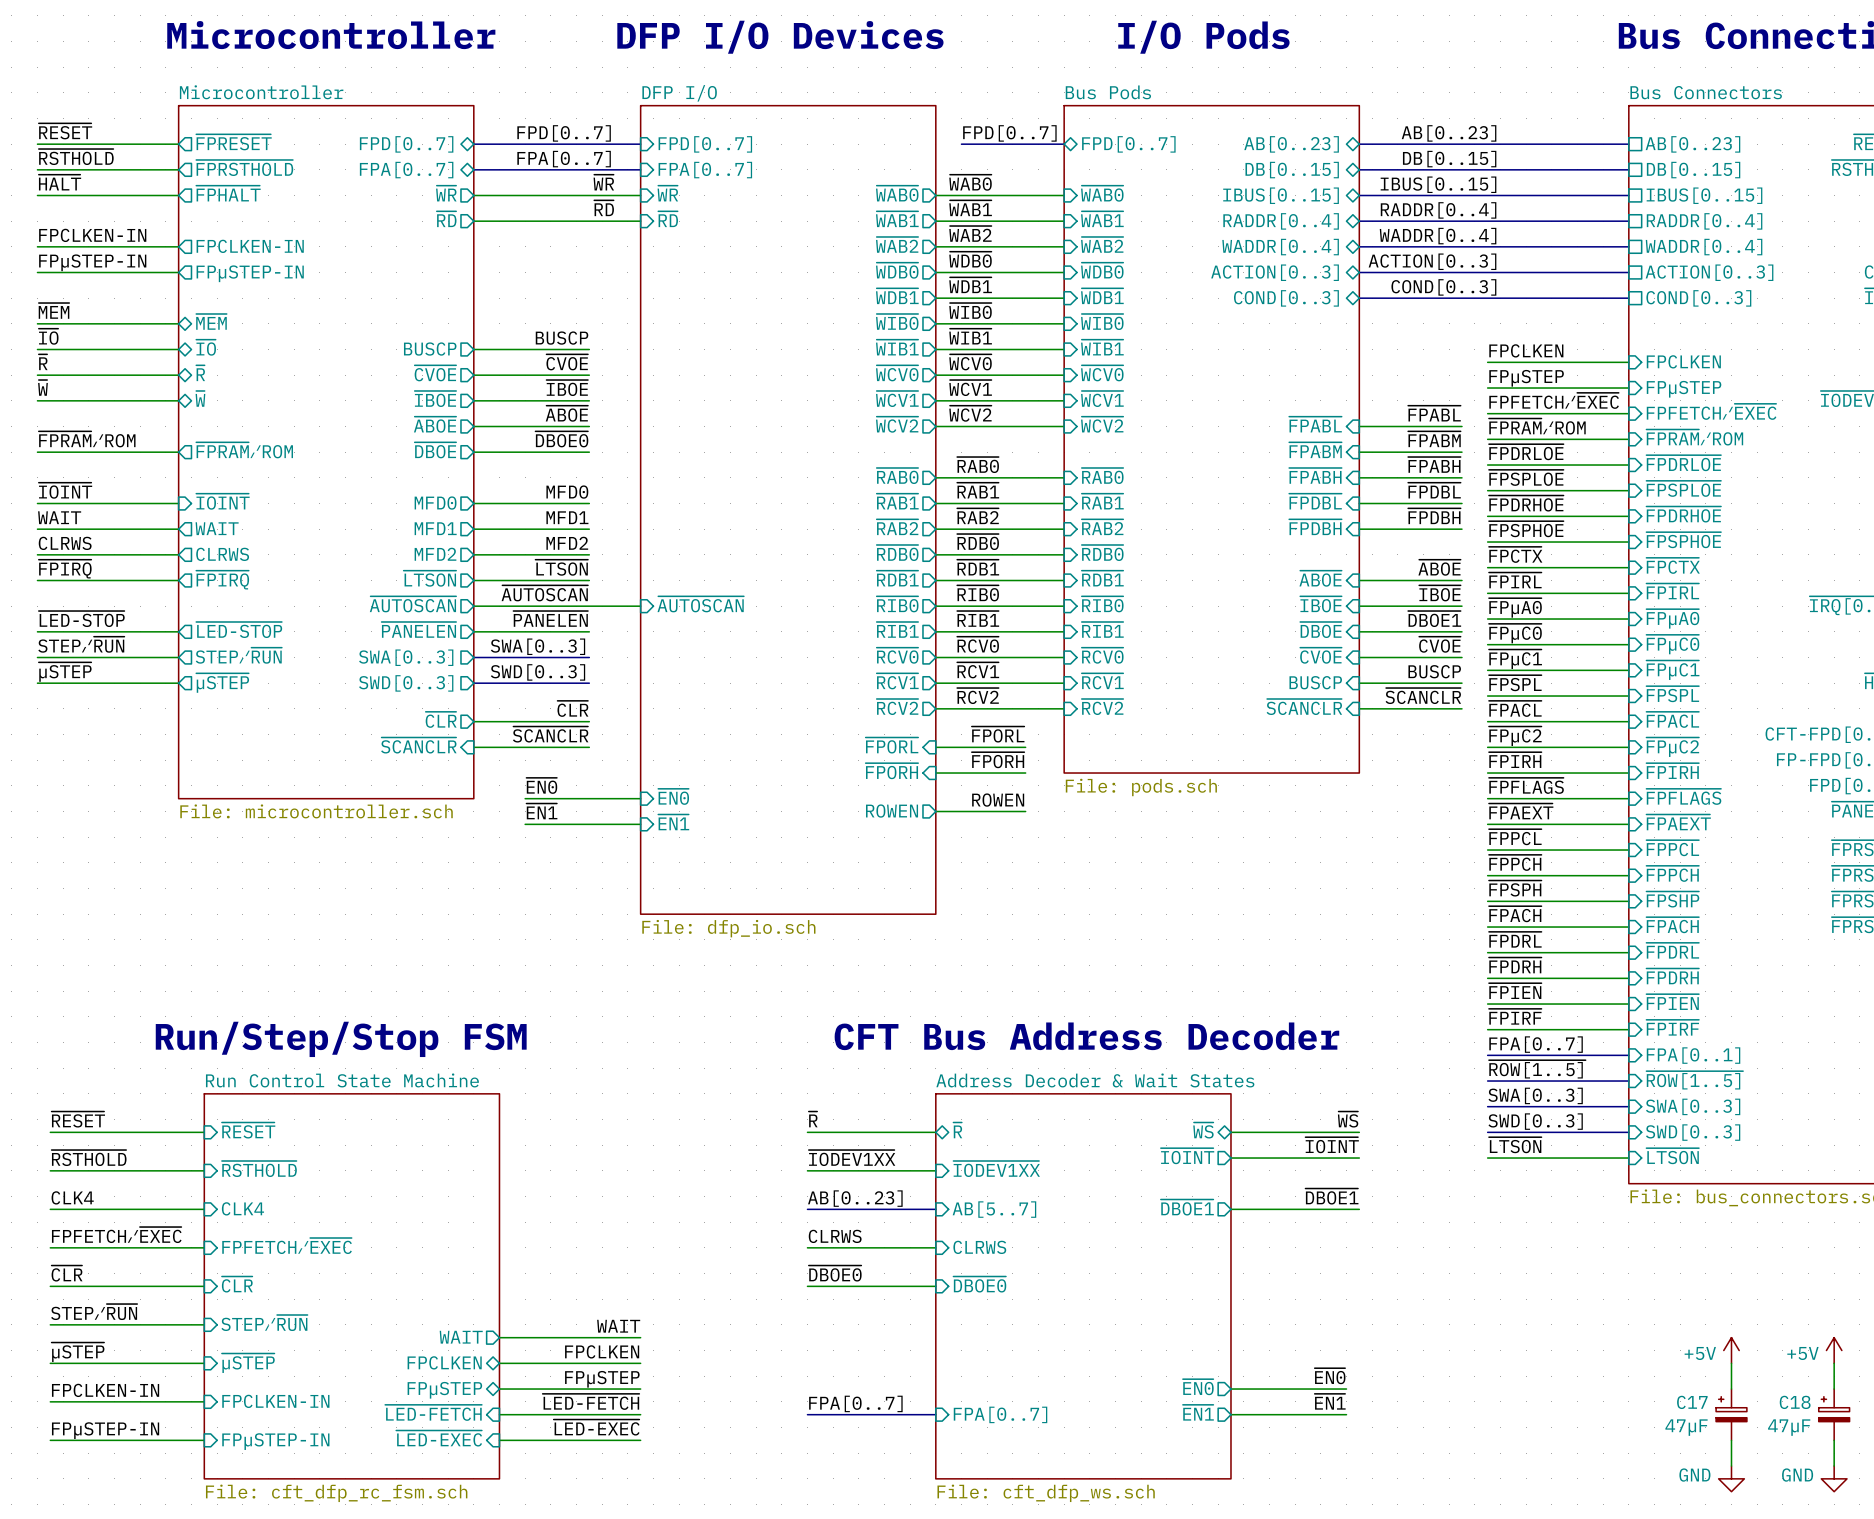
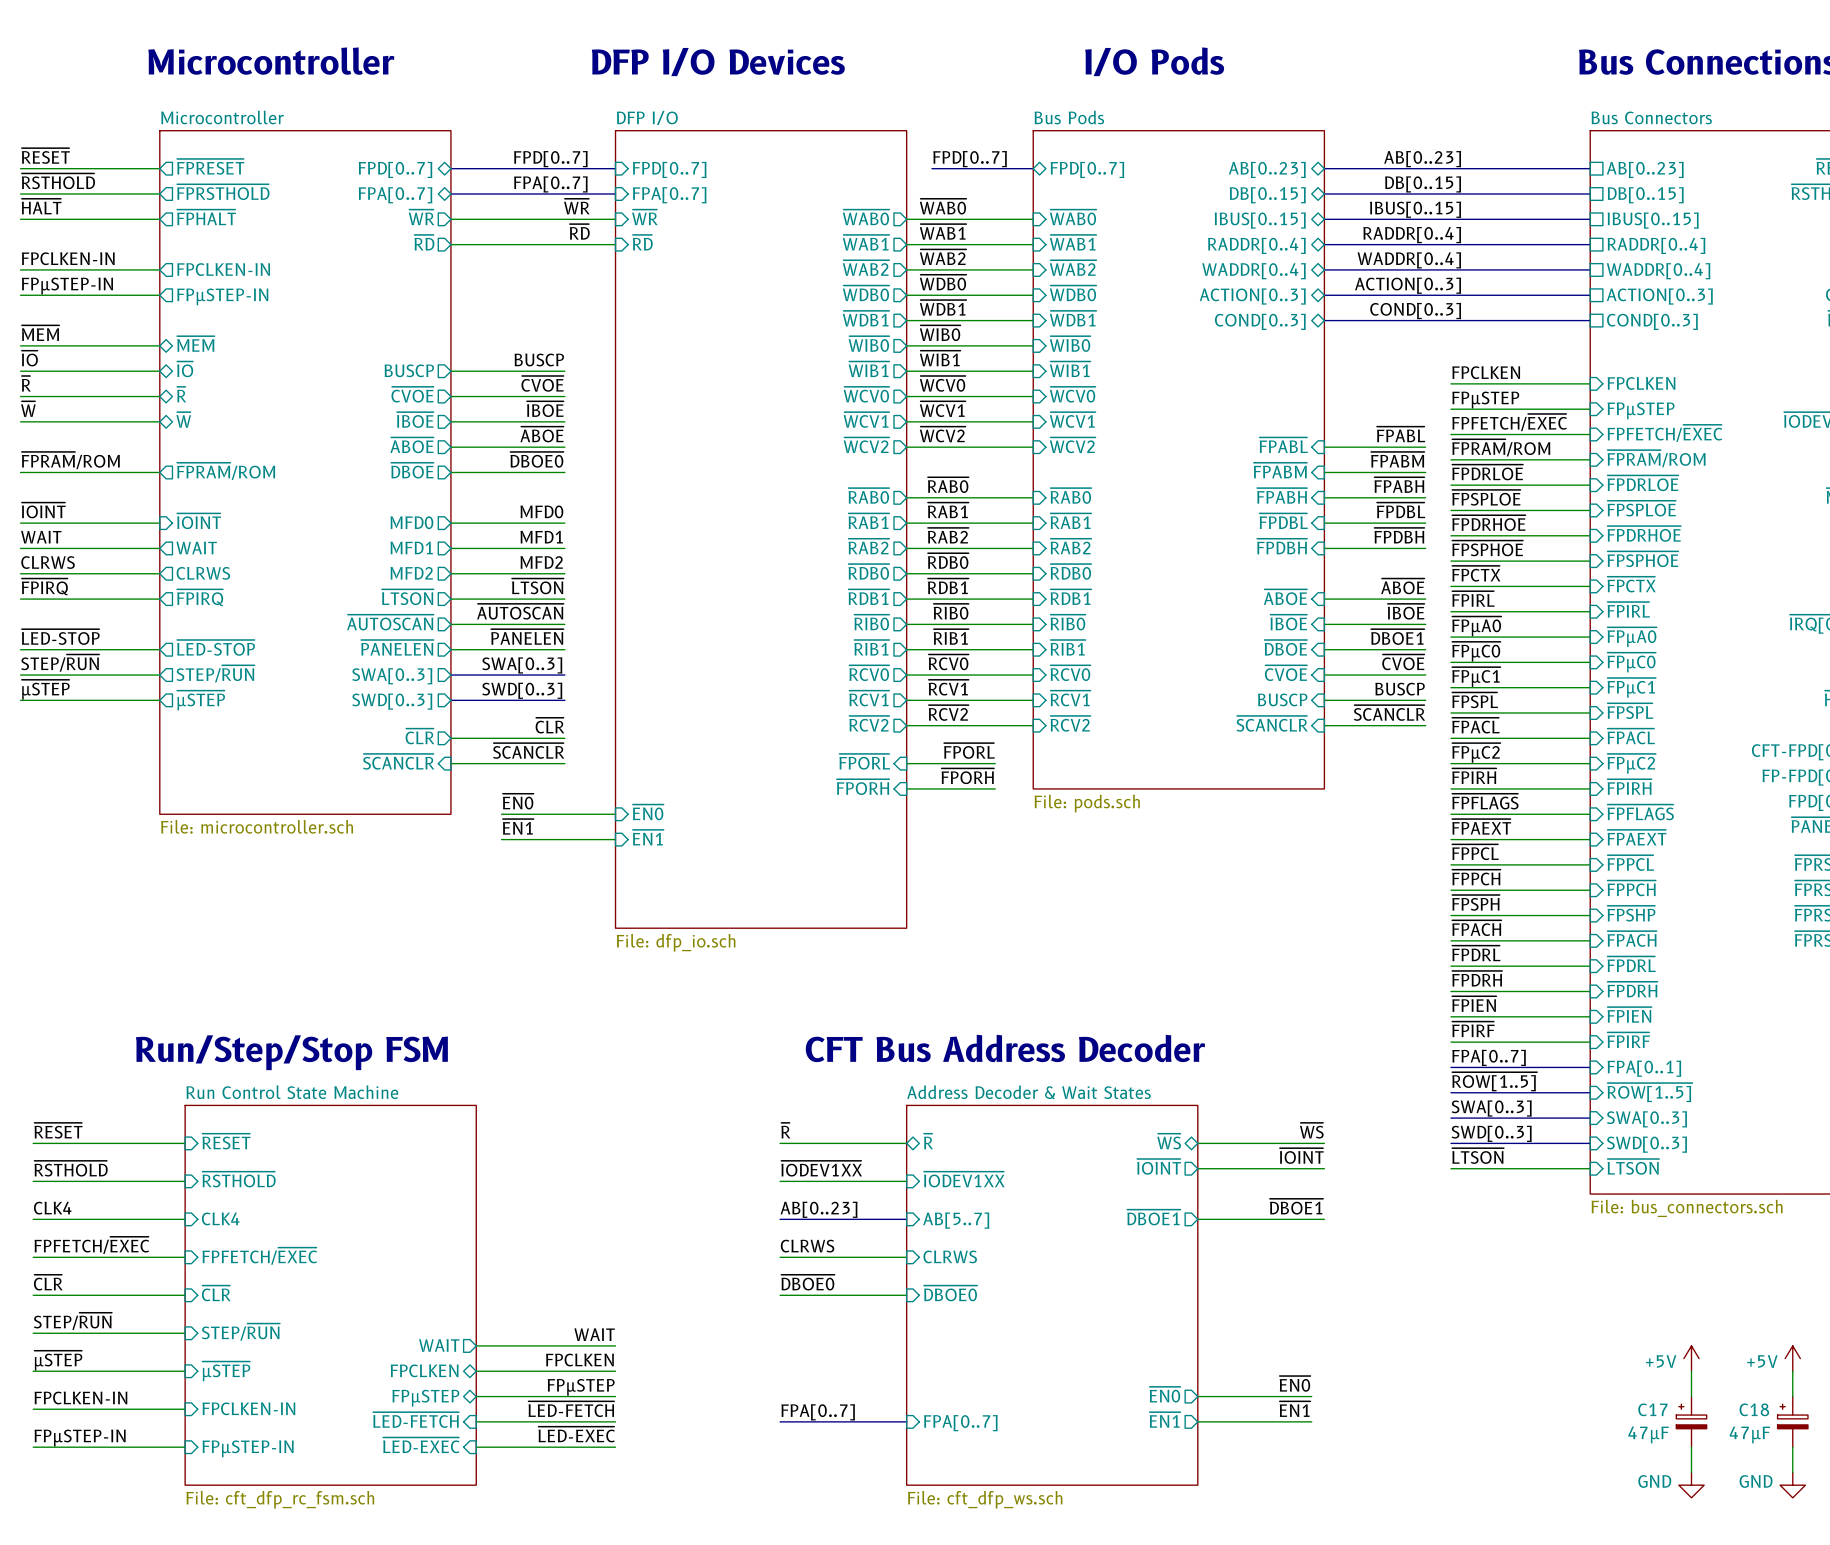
sheet pin: ~{AUTOSCAN} (700, 604) -> none
wire: (589, 606) (640, 606) -> none
label: ROWEN (998, 800) -> none
sheet pin: ROWEN (892, 811) -> none
wire: (935, 811) (1025, 811) -> none

